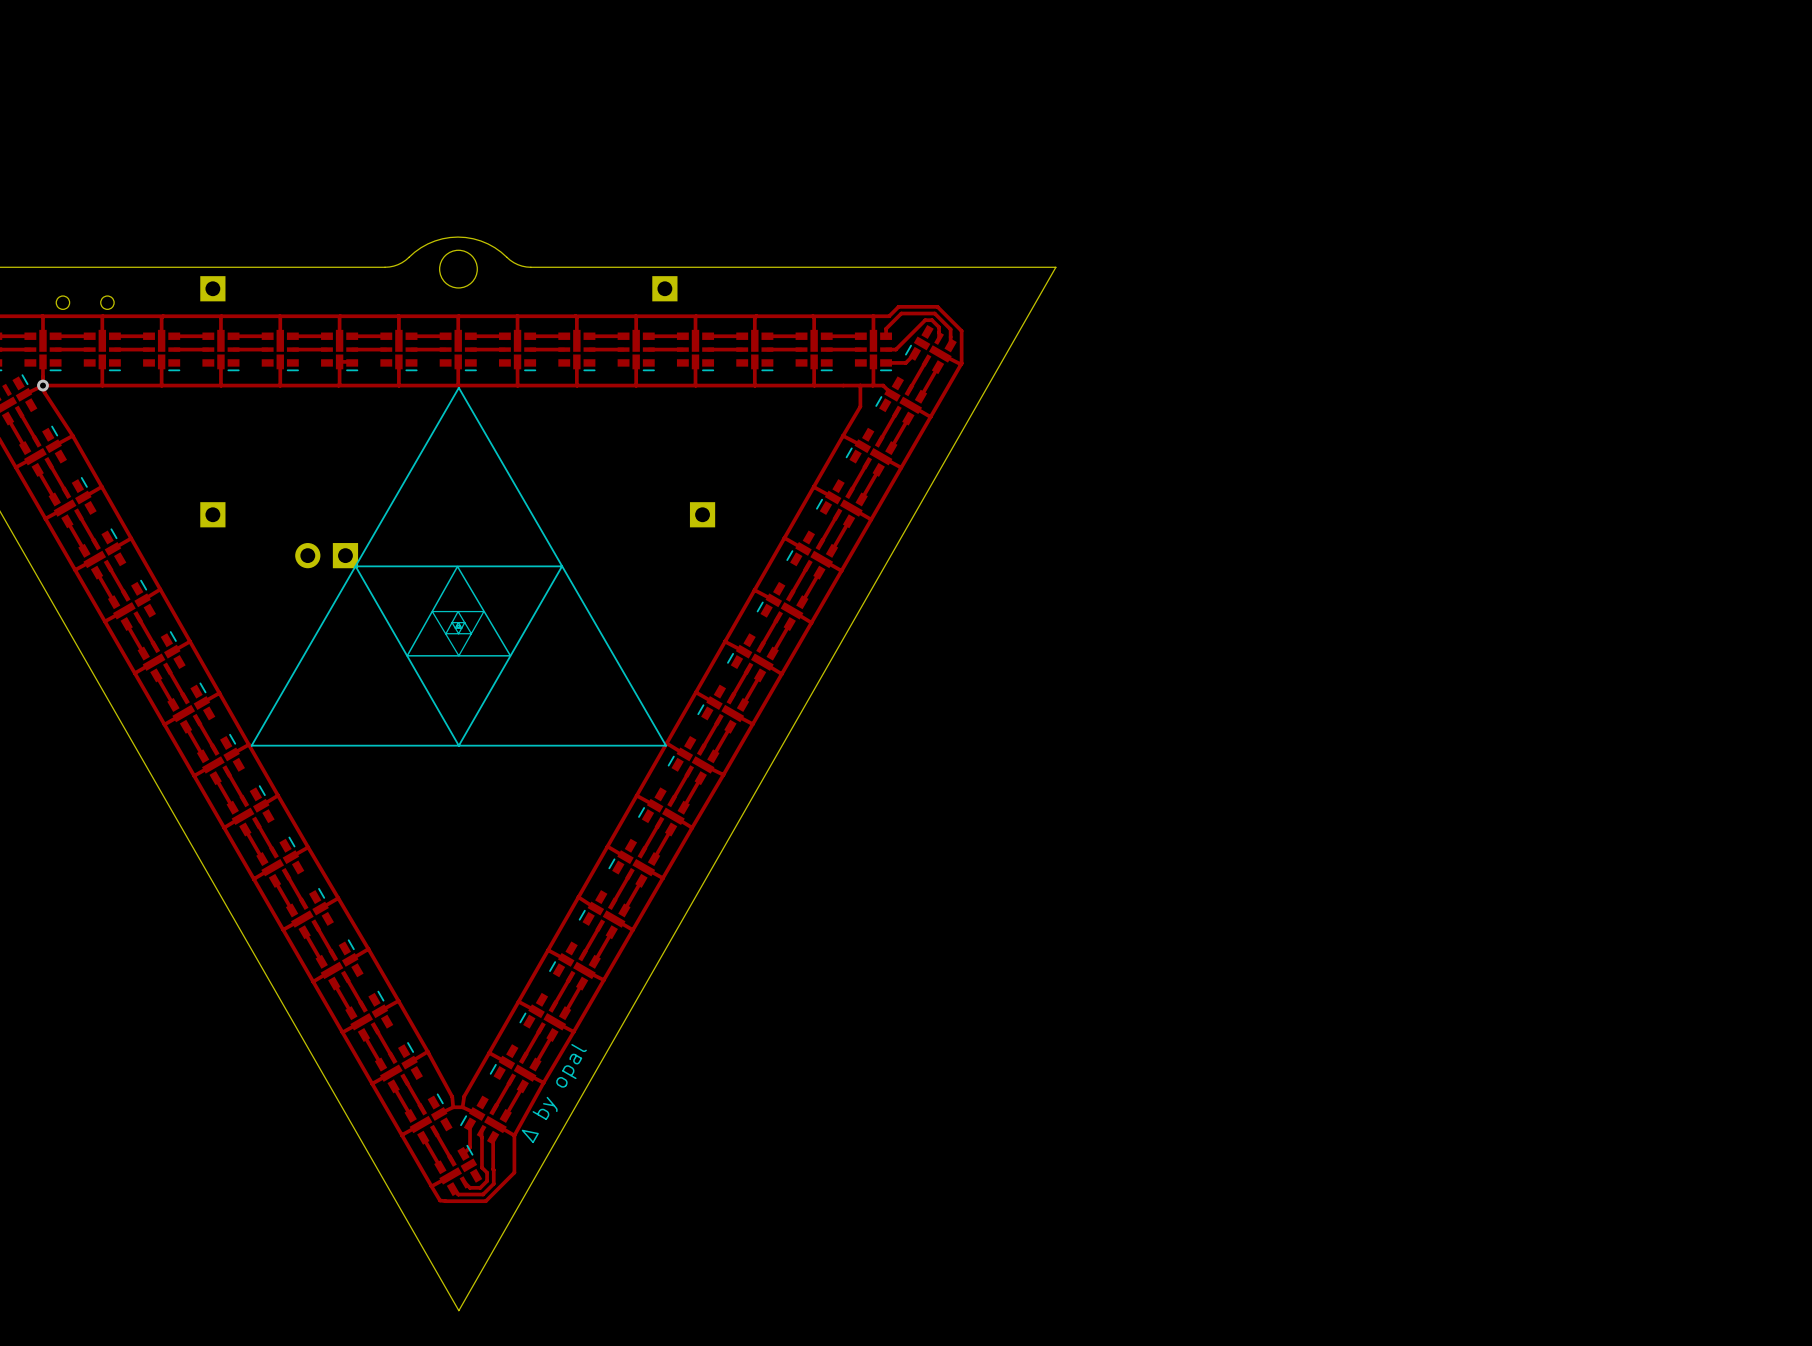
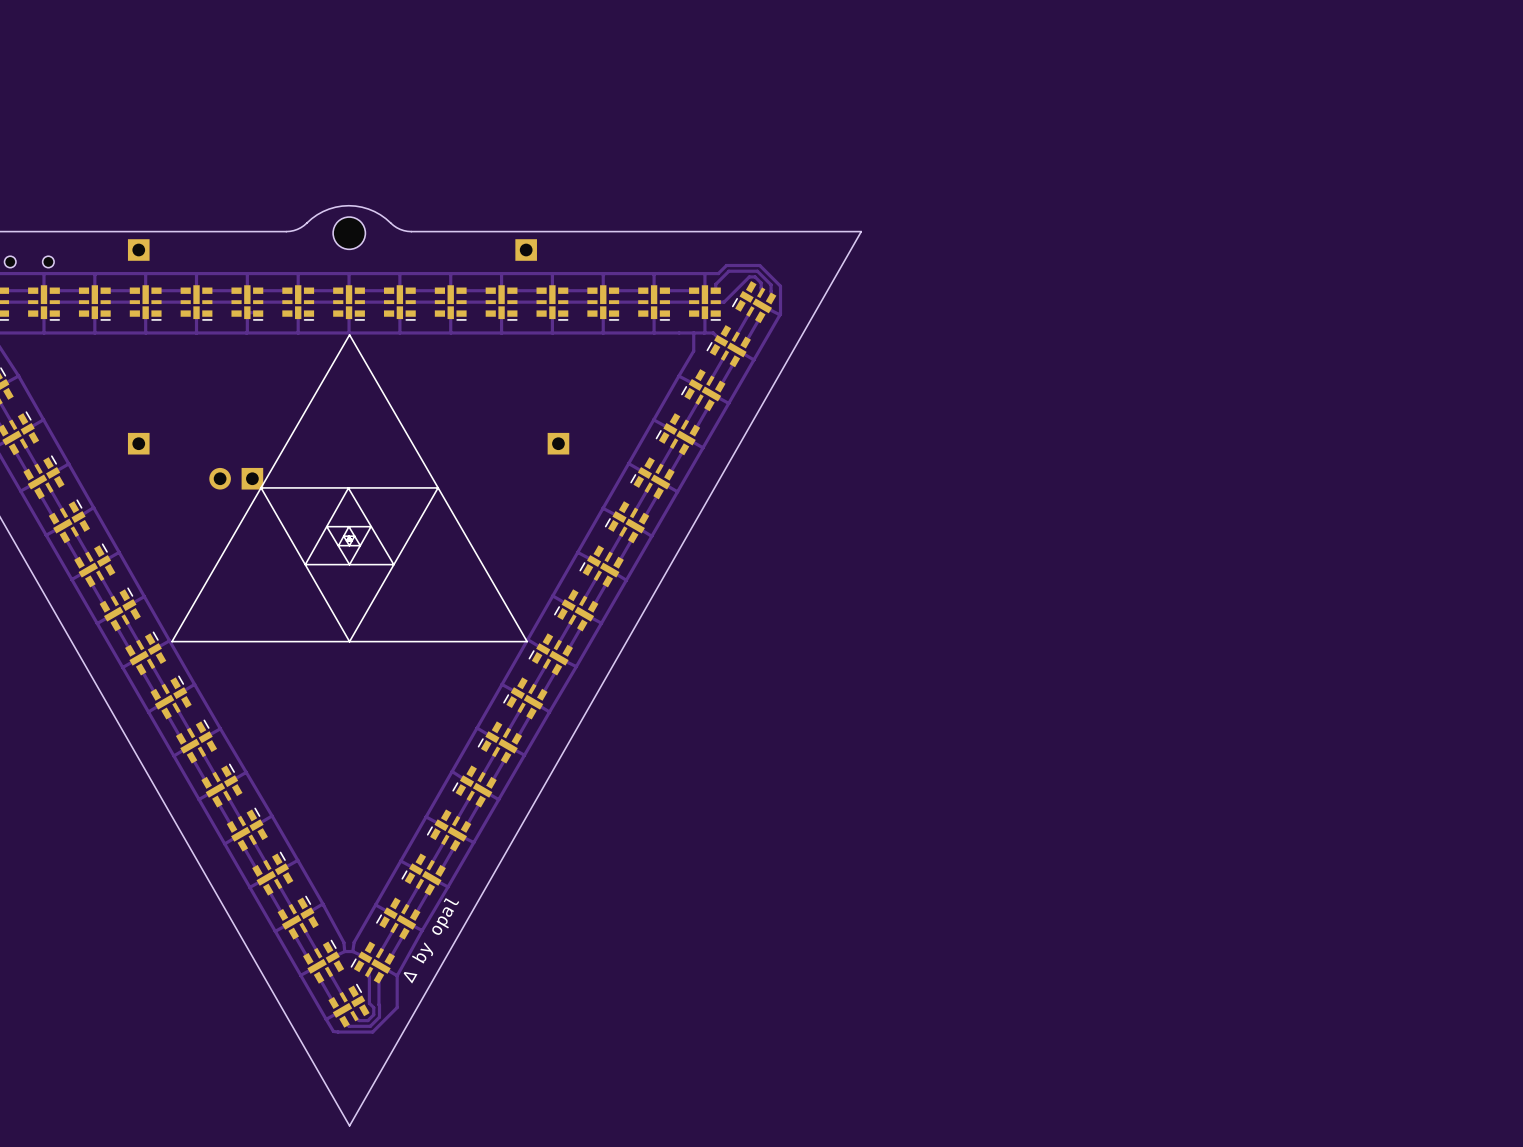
track: (914, 353) (905, 362) (886, 362) -> none
track: (470, 1124) (470, 1147) (463, 1153) -> none

